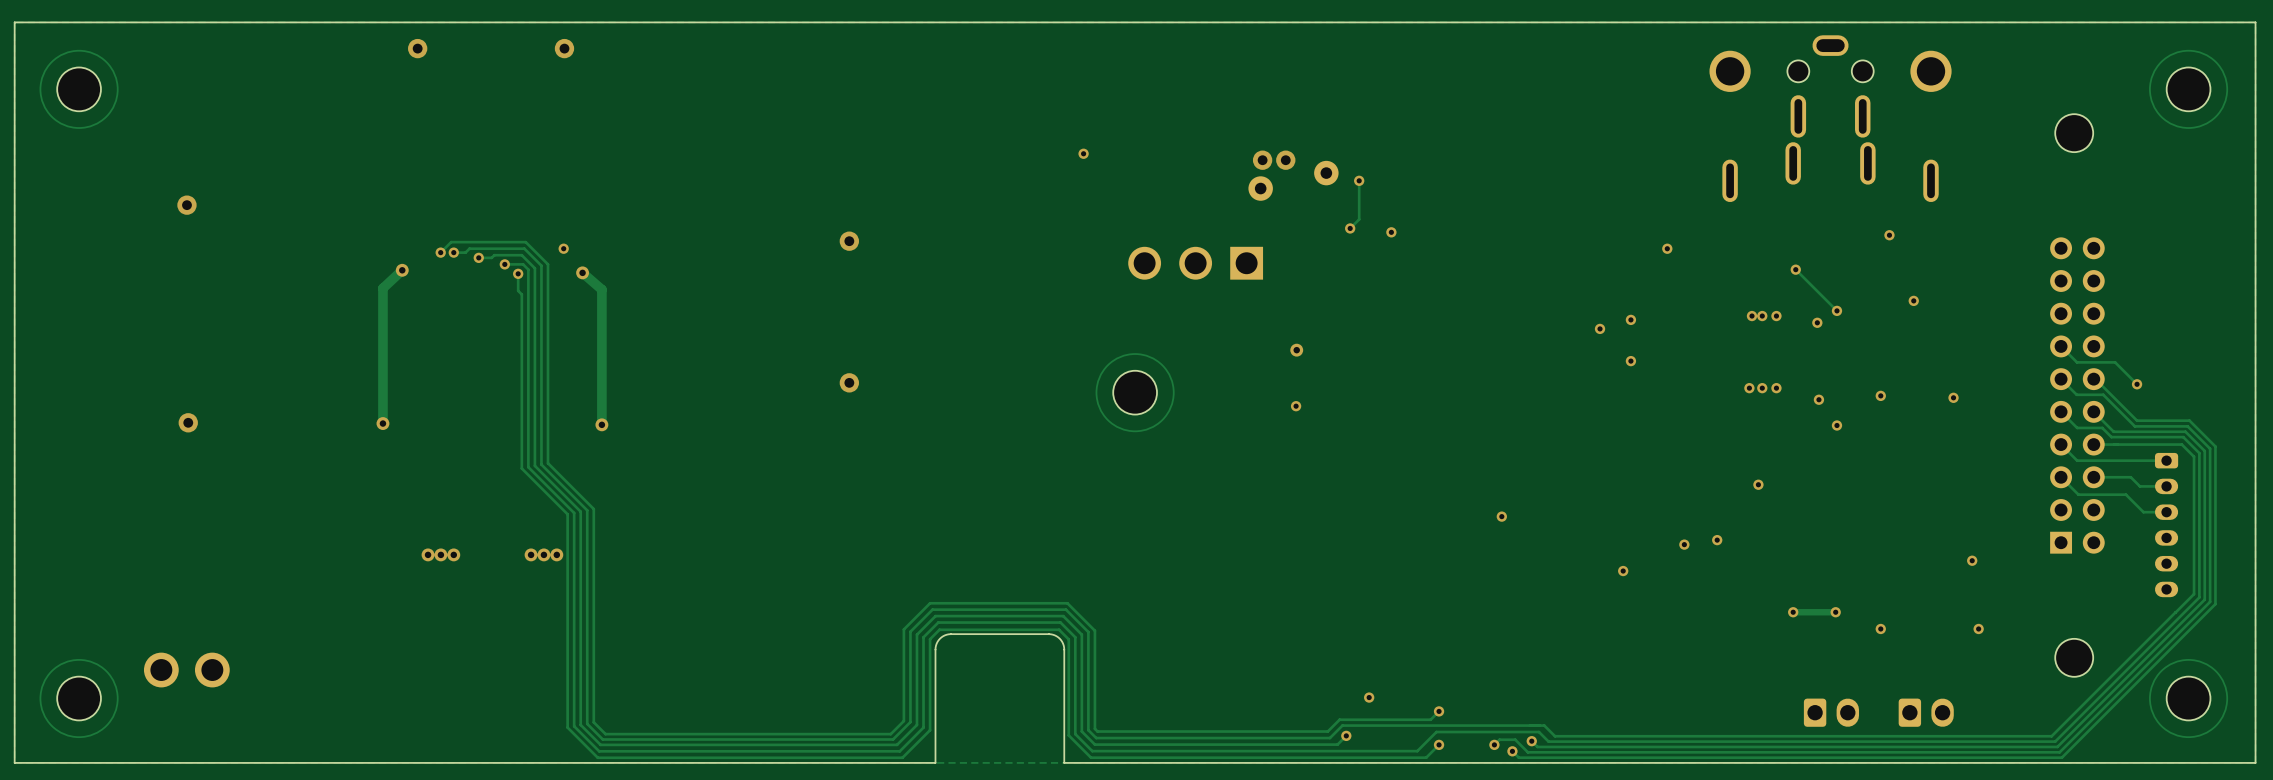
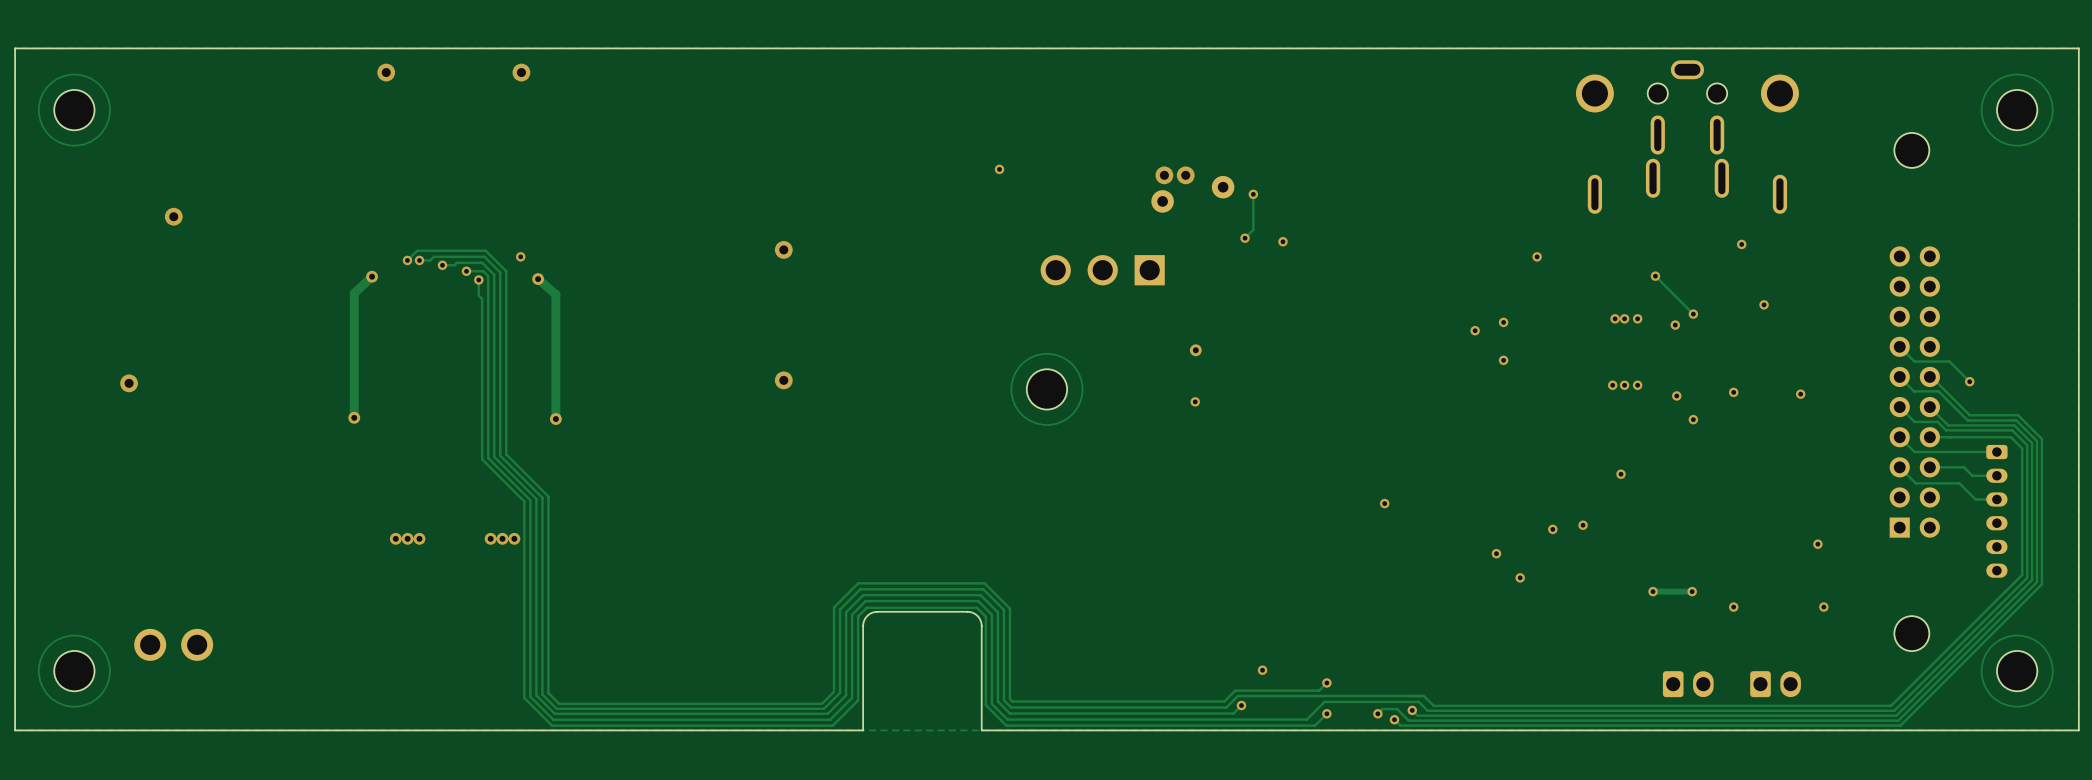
via position: (188, 422) -> (129, 383)
via: none -> (1520, 577)

